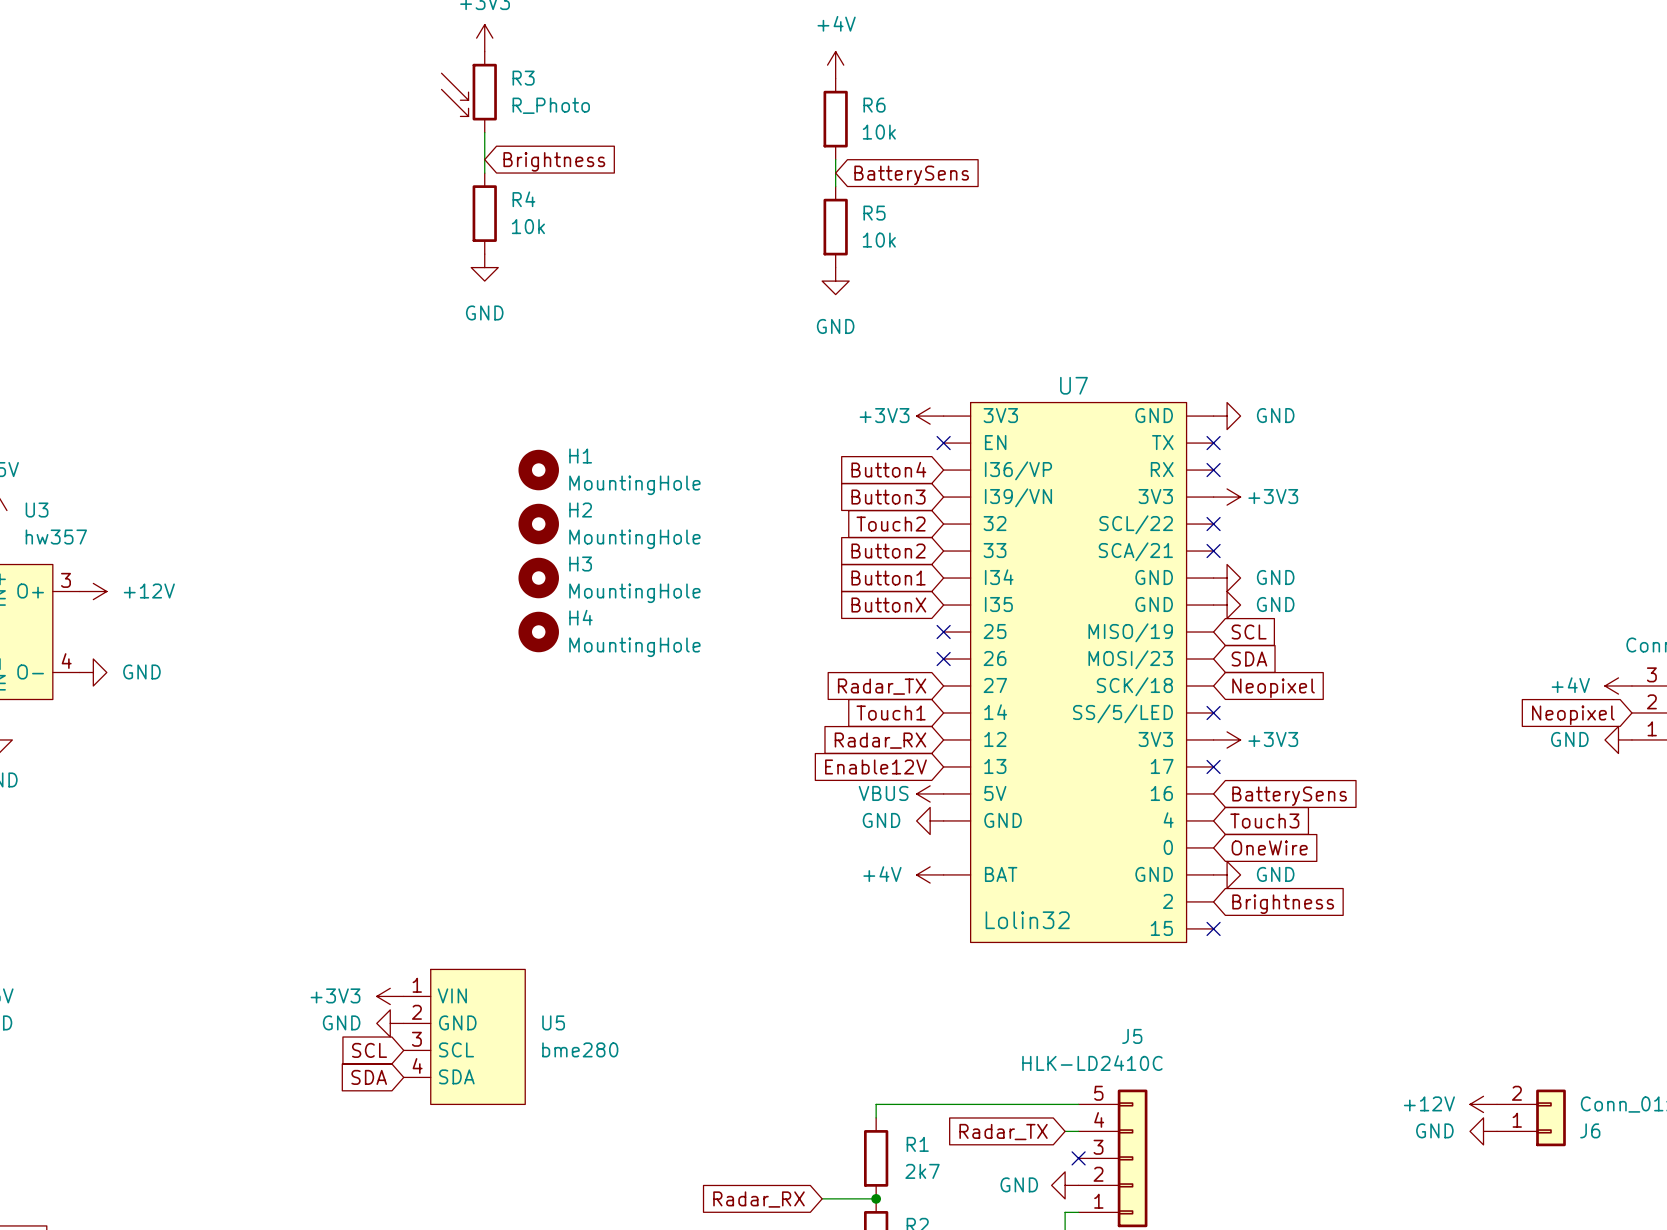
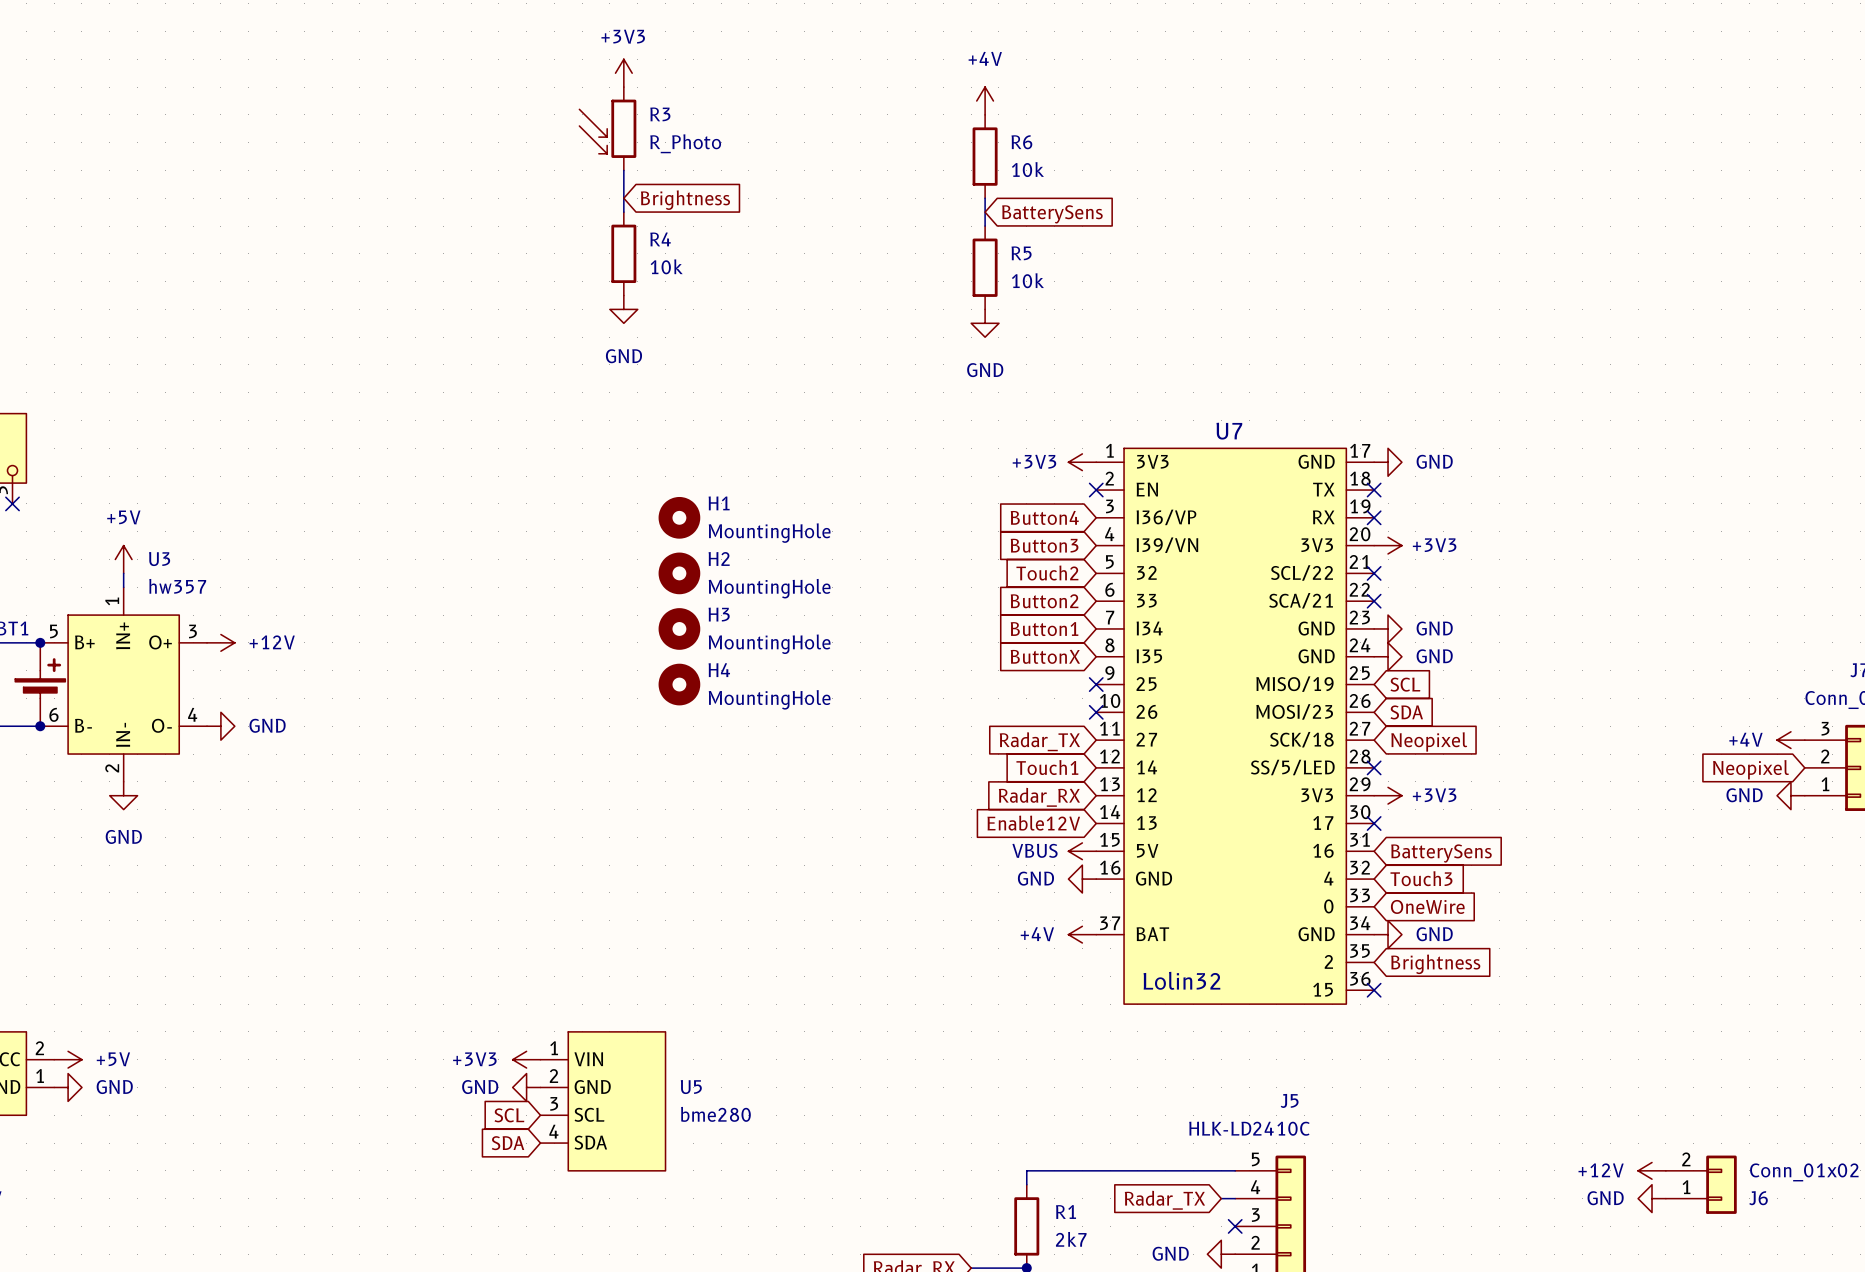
U7 symbol: [943, 402, 1214, 943] -> [1096, 448, 1375, 1005]

